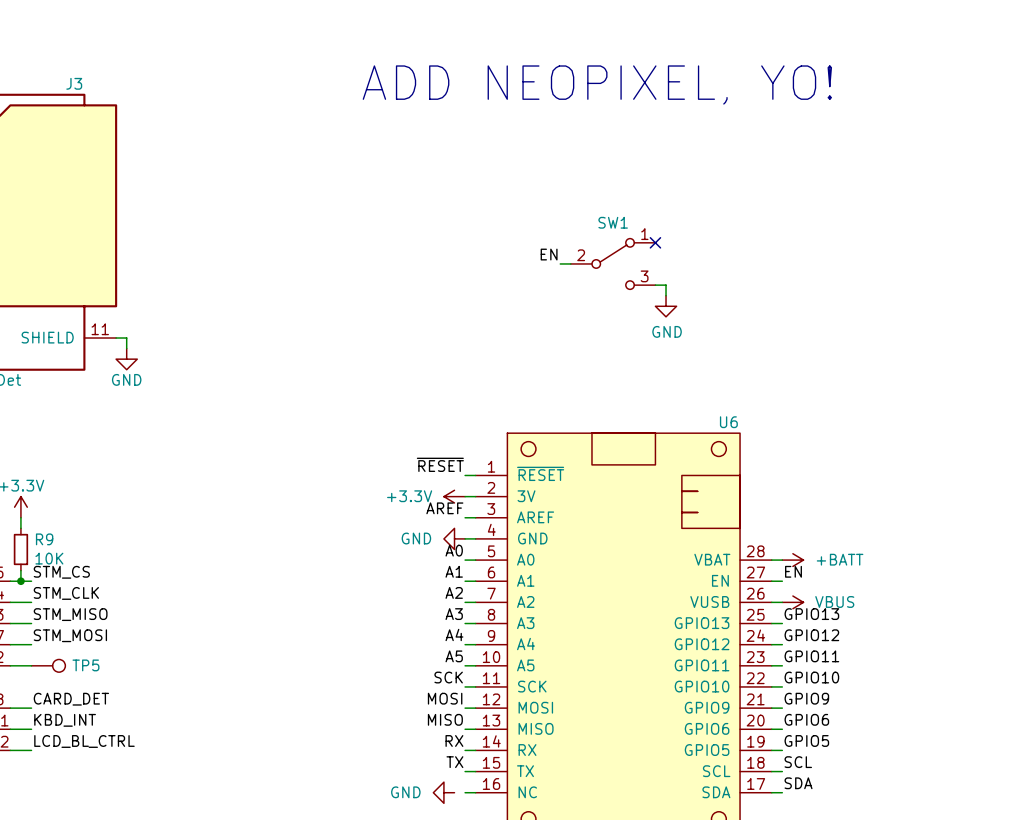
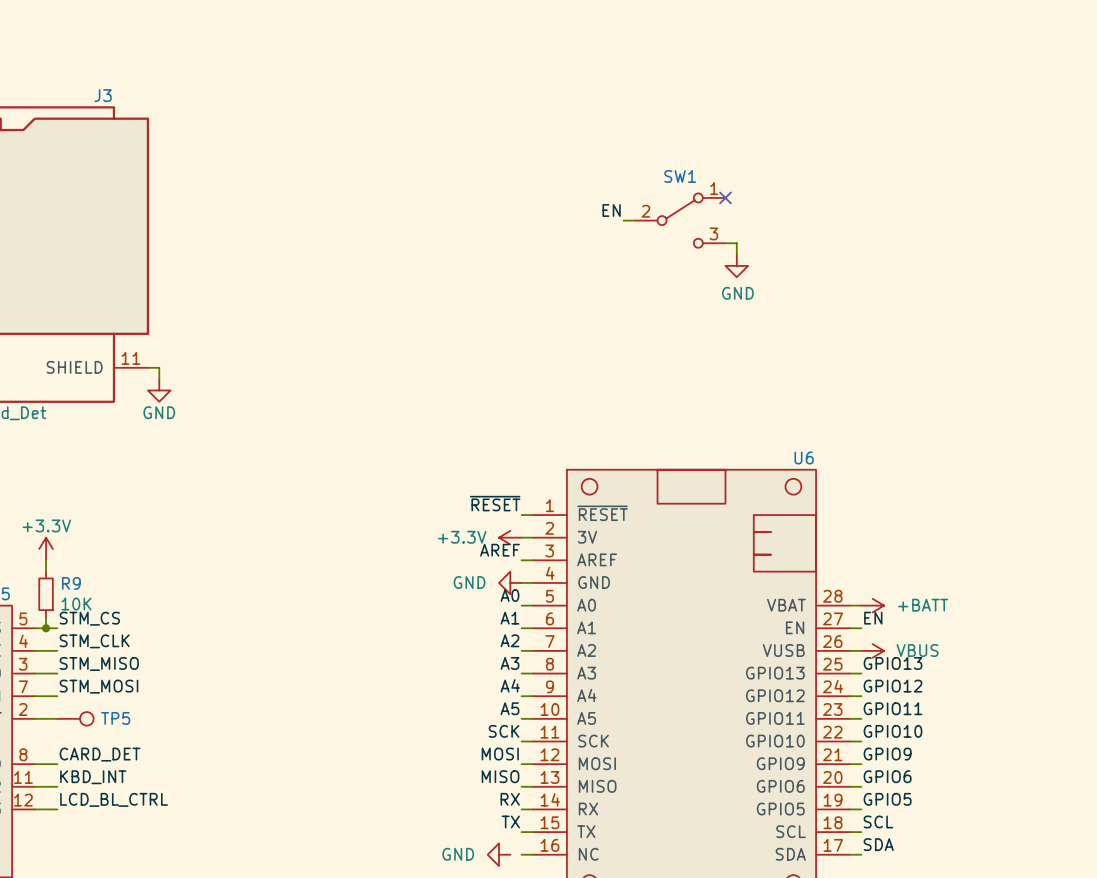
text: ADD NEOPIXEL, YO! (597, 84) -> none
no-connect mark: none -> (725, 197)
no-connect mark: (655, 242) -> none
label position: EN (549, 254) -> EN (611, 210)
wire: (560, 263) (570, 263) -> (623, 220) (634, 220)
SW1 position: (613, 263) -> (680, 220)
wire: (655, 285) (666, 285) (666, 295) -> (725, 243) (736, 243) (736, 254)
power symbol position: GND (666, 306) -> GND (736, 265)

